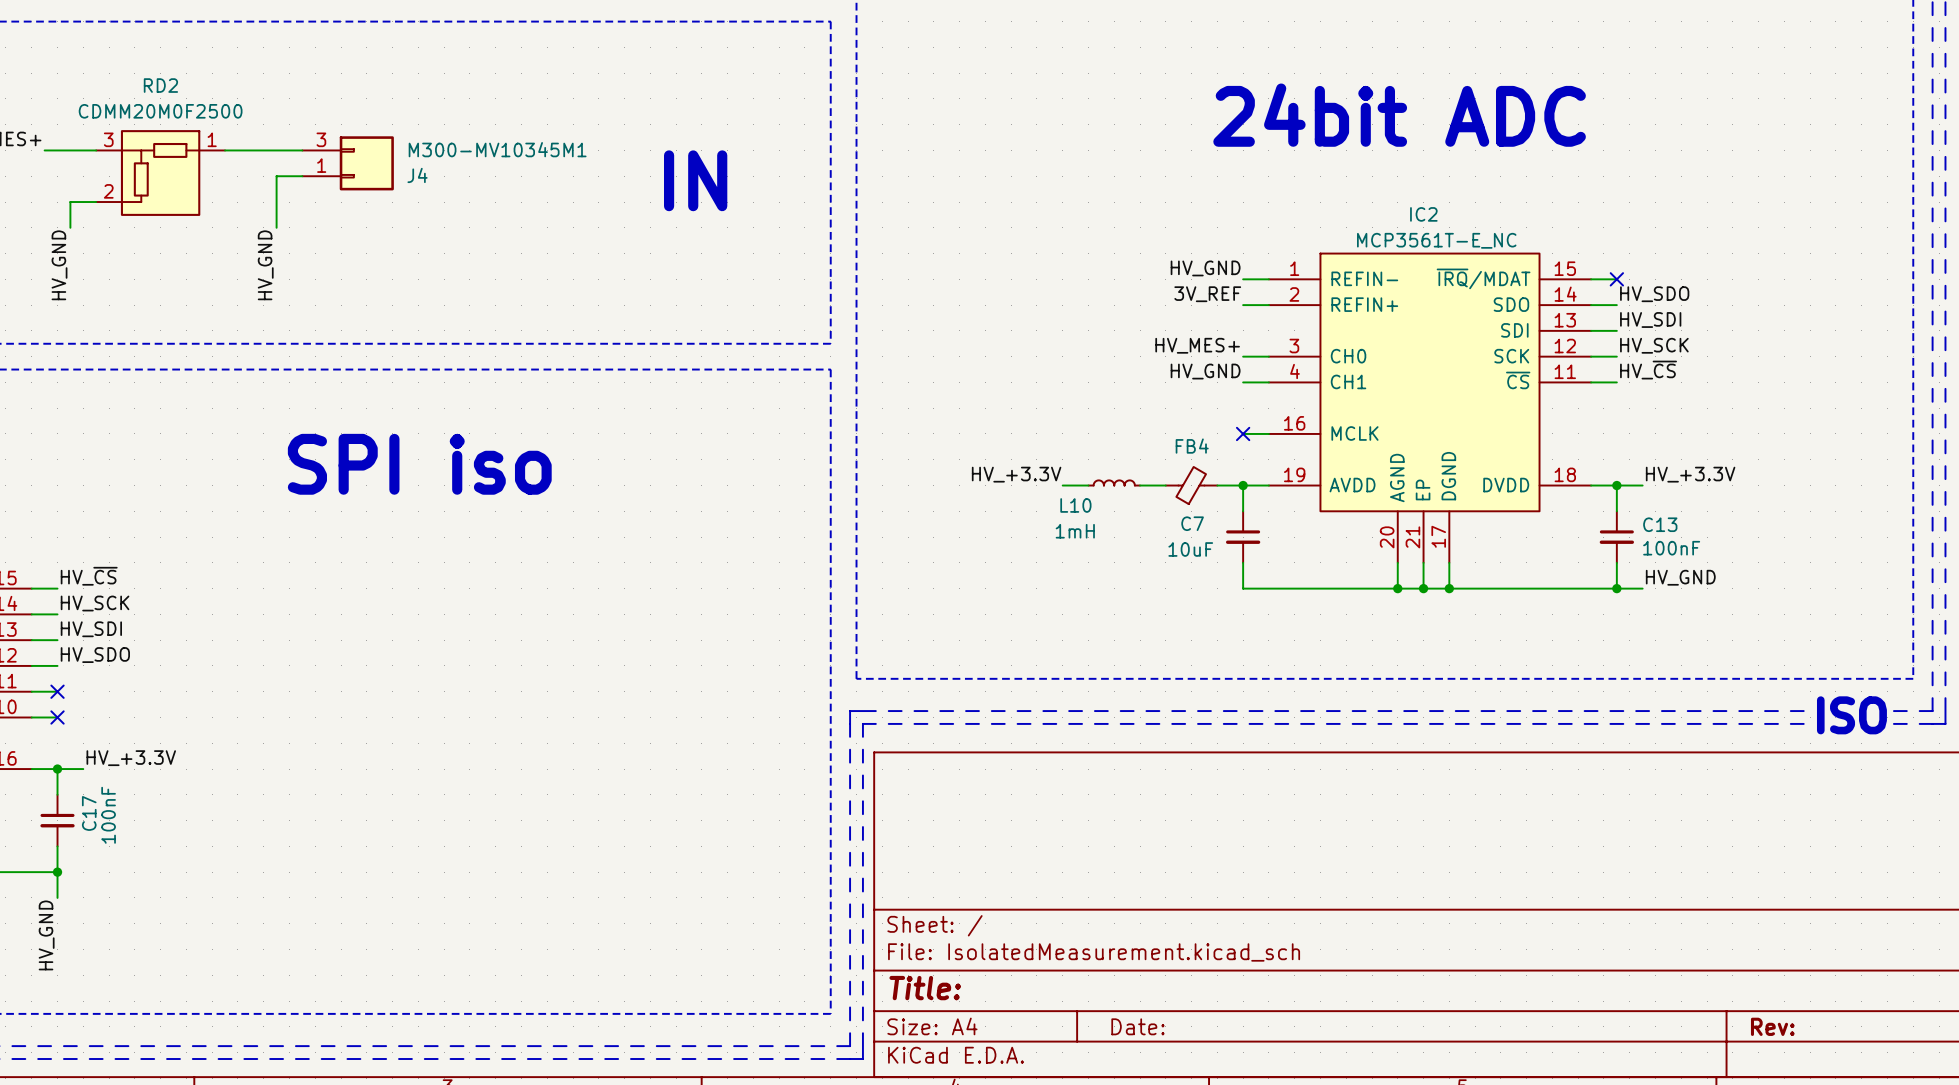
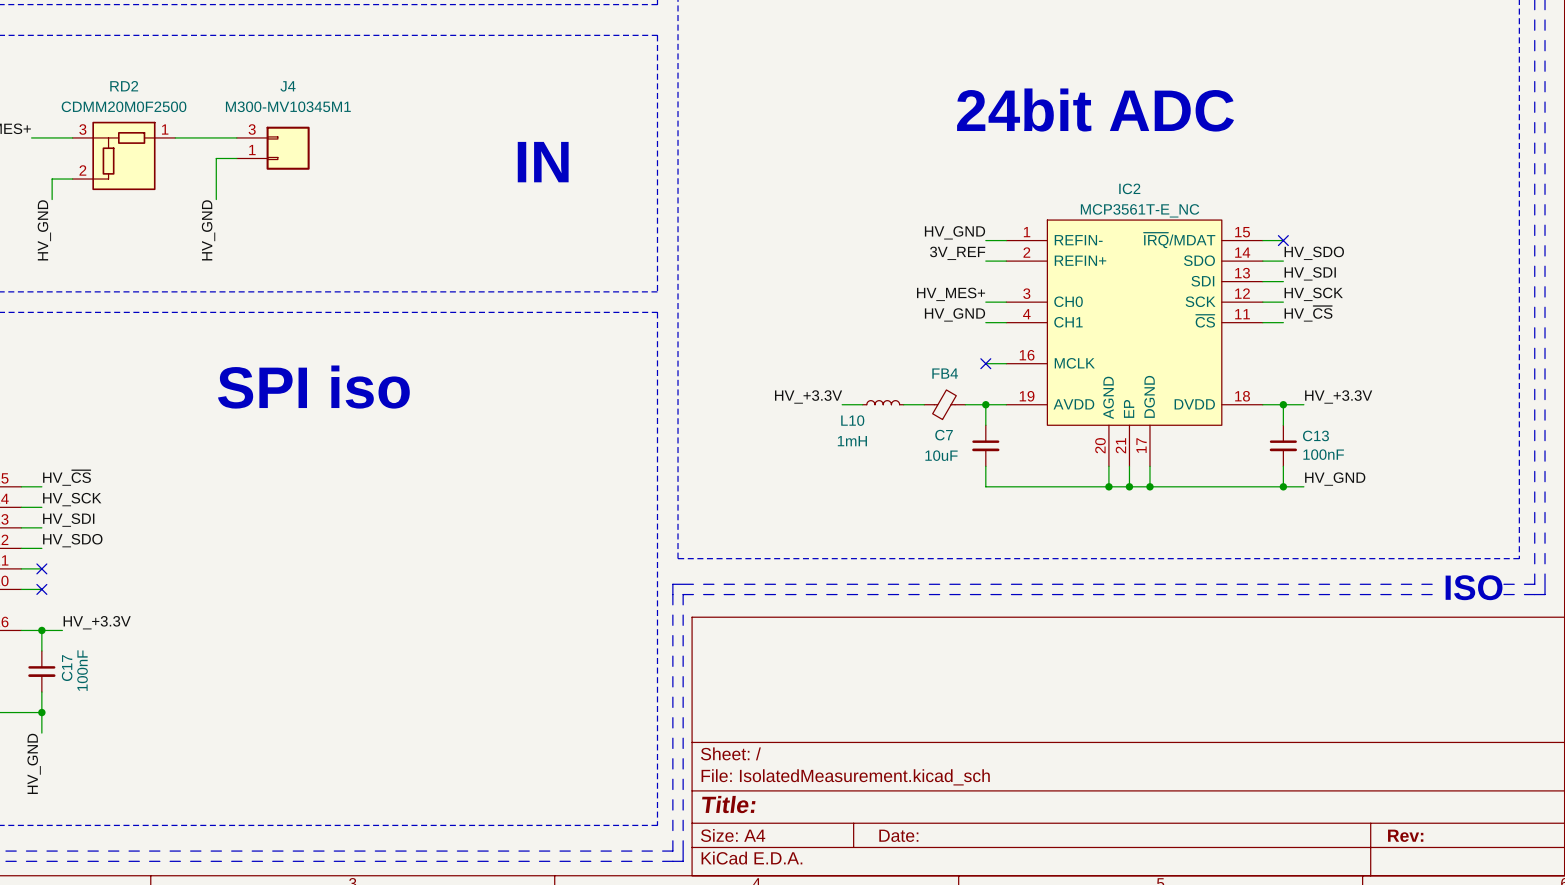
J4 value position: M300-MV10345M1 (497, 149) -> M300-MV10345M1 (288, 106)
J4 name position: J4 (417, 175) -> J4 (288, 86)

